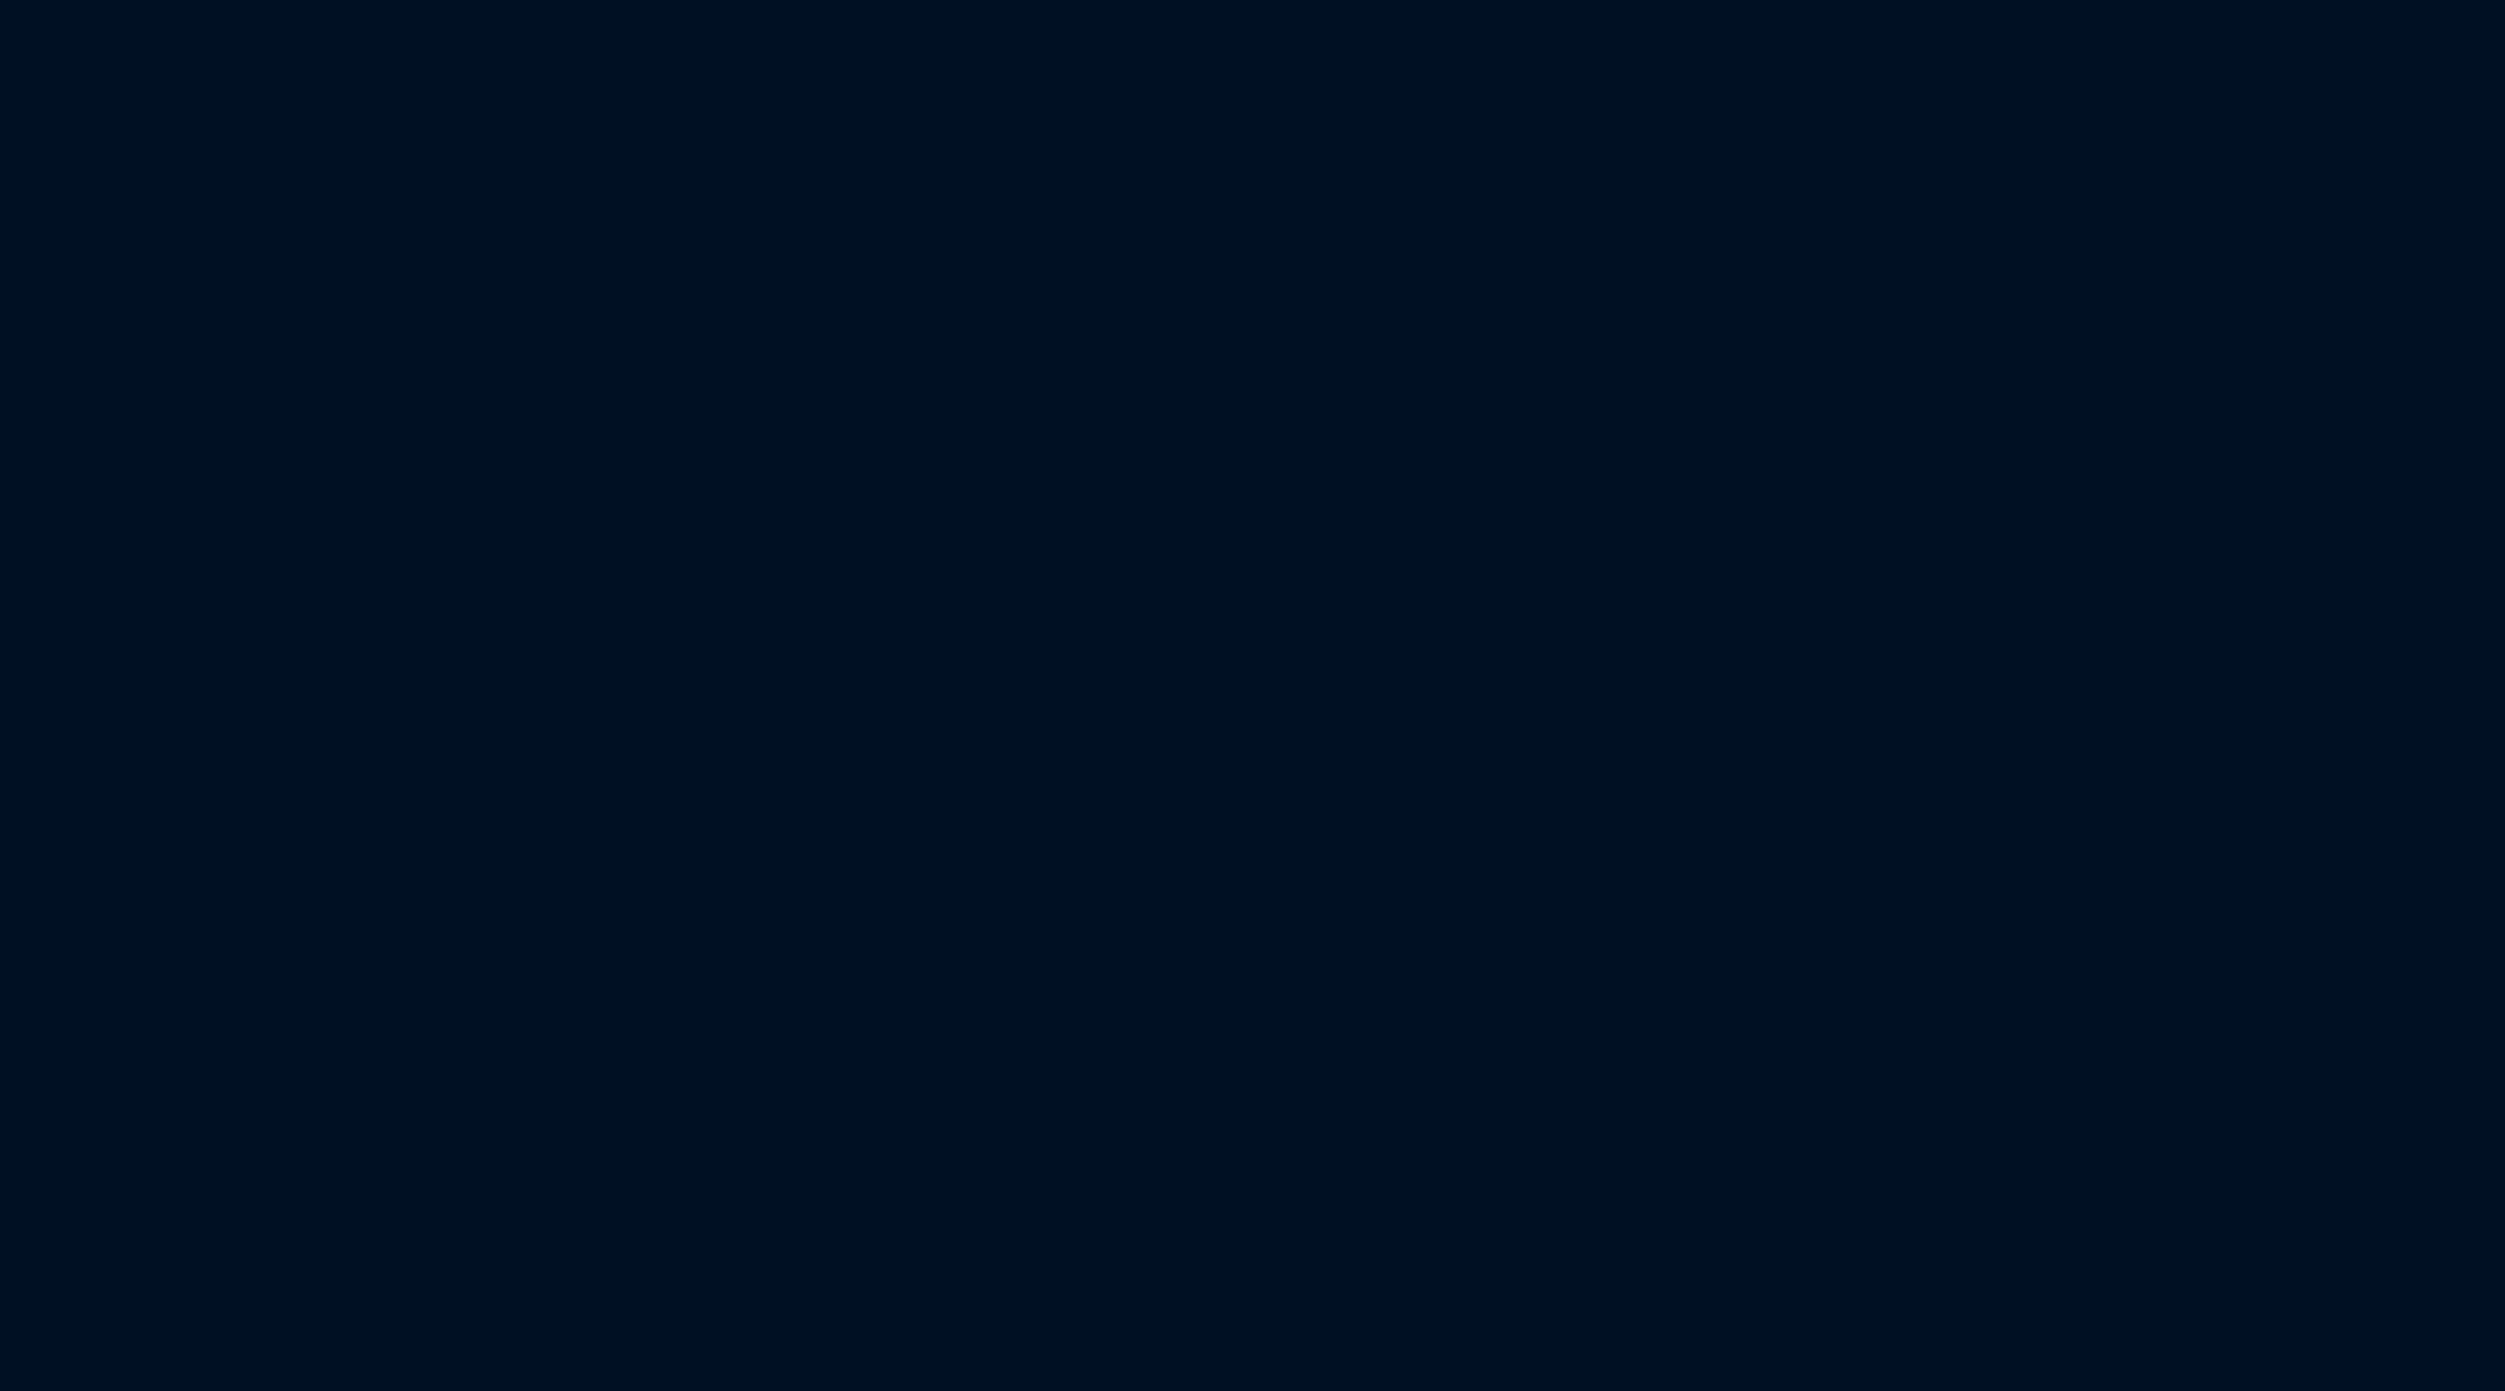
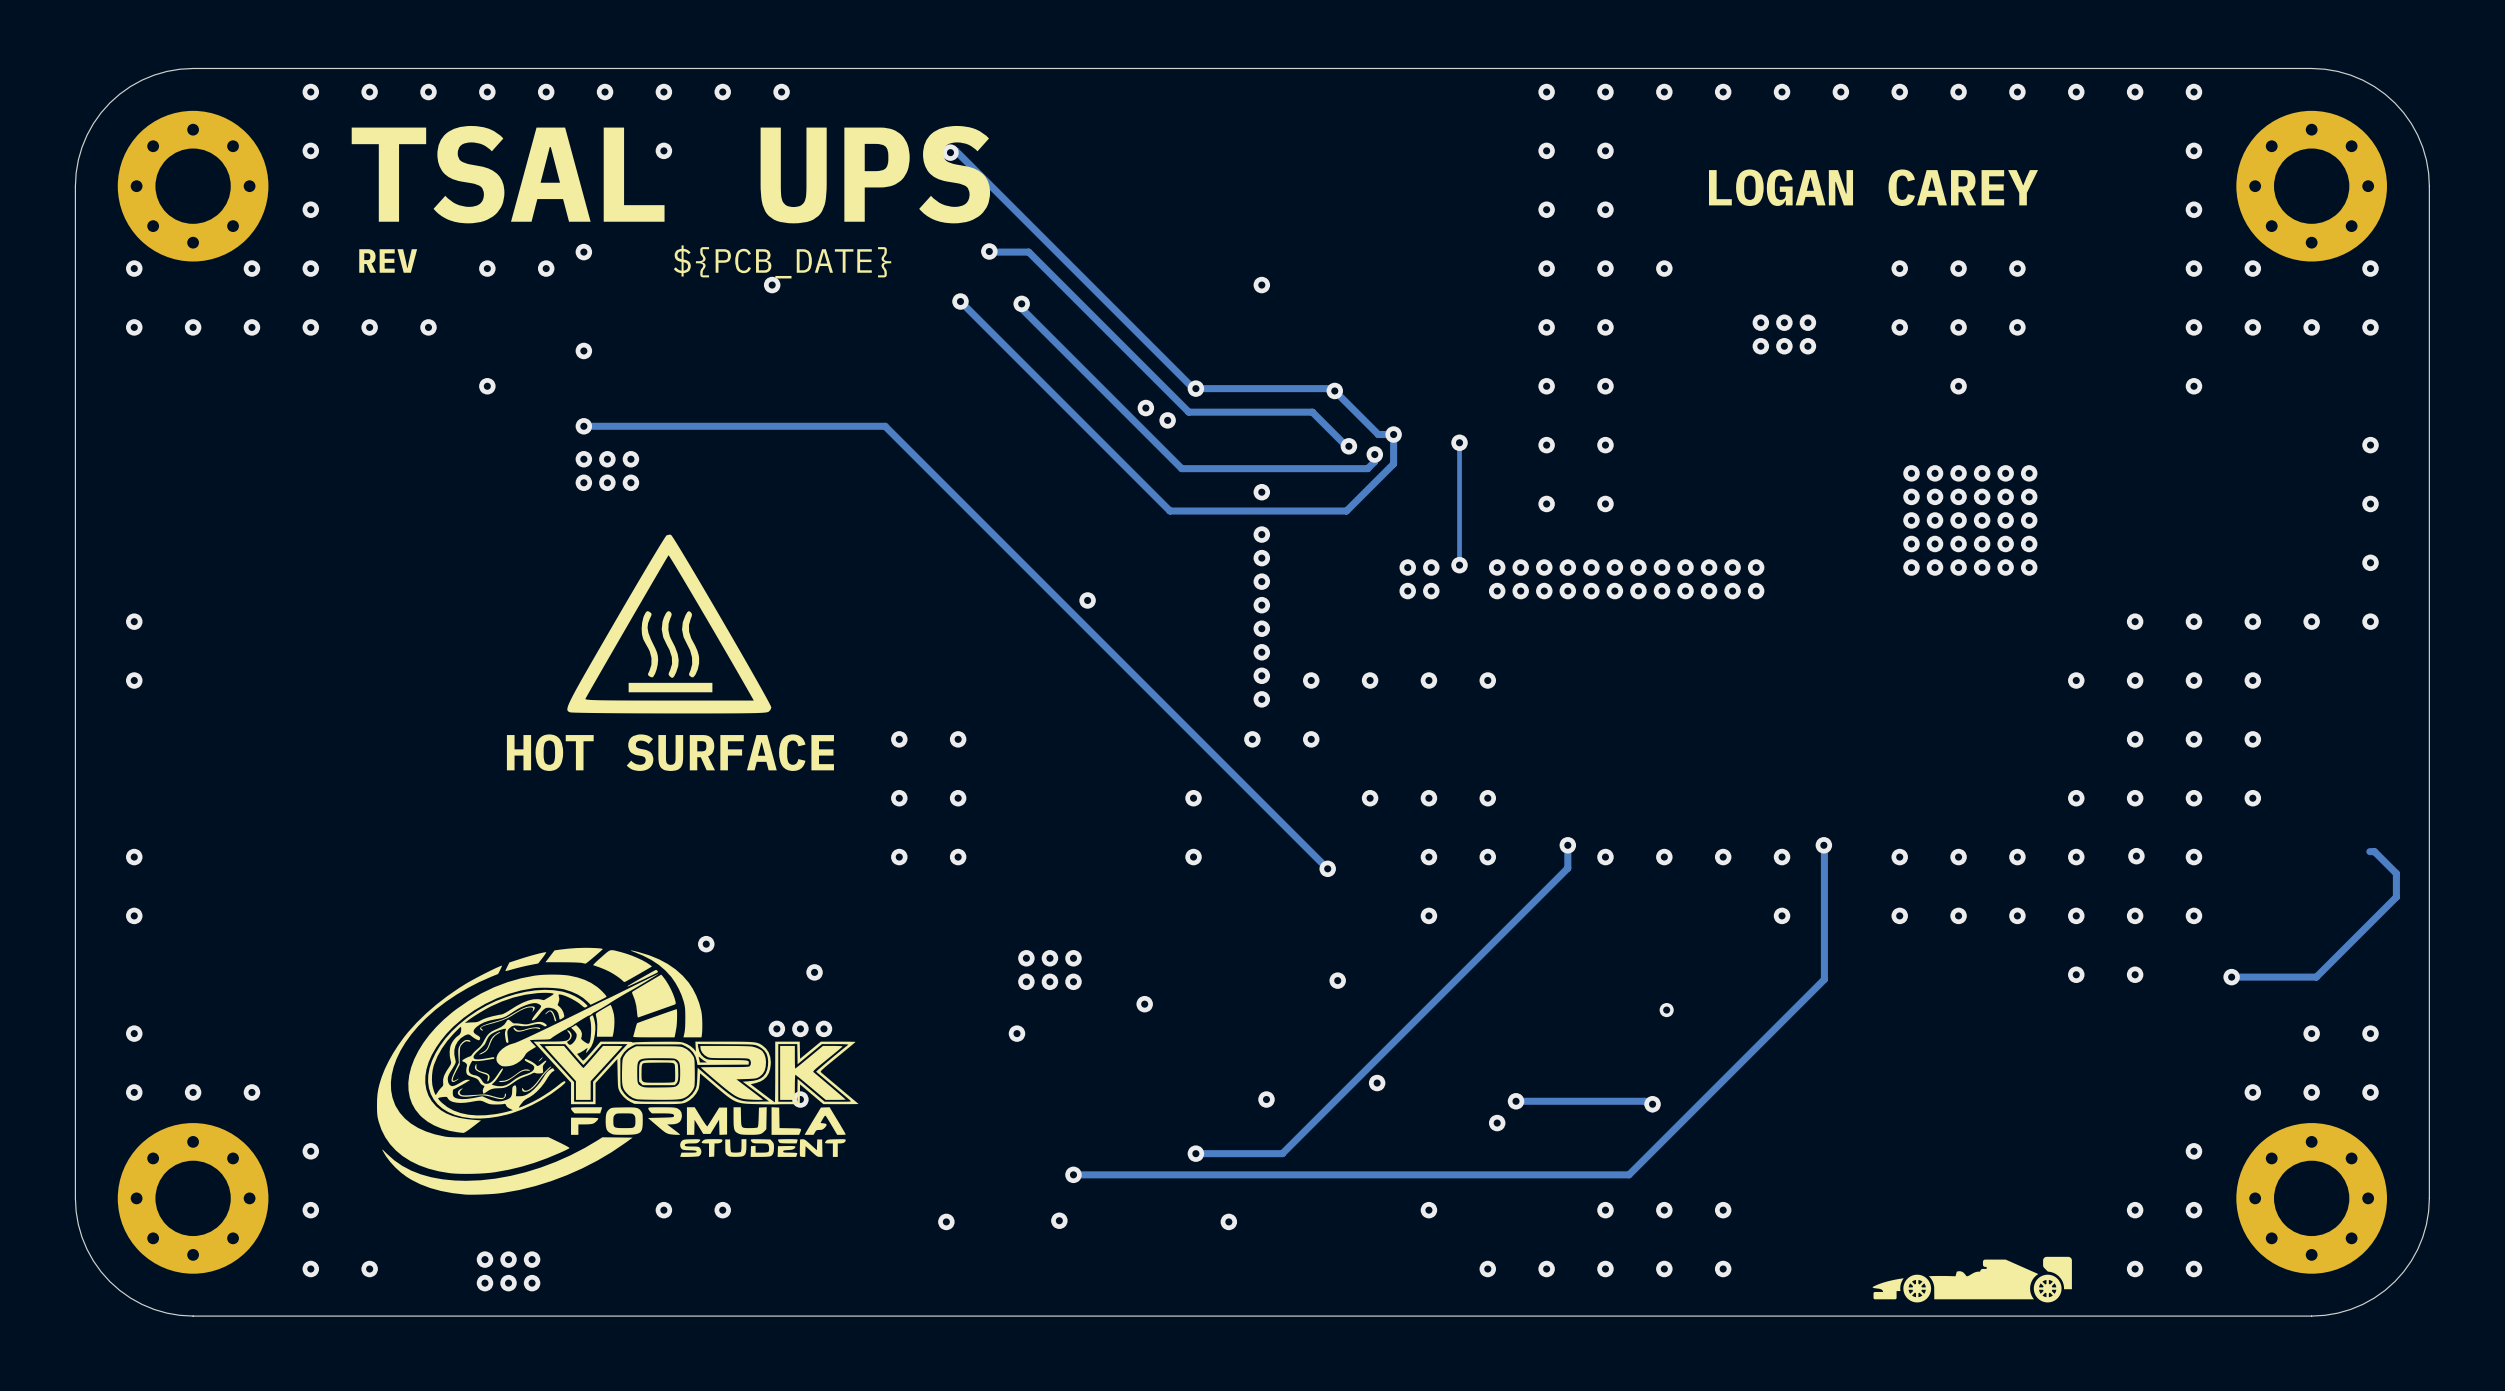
board edge: none -> (2311, 68) (193, 68) (166, 71) (142, 80) (119, 94) (93, 123) (82, 147) (75, 186) (75, 1198) (78, 1224) (87, 1249) (109, 1281) (130, 1298) (166, 1313) (193, 1316) (2311, 1316) (2337, 1313) (2362, 1304) (2385, 1290) (2411, 1261) (2422, 1237) (2428, 1211) (2429, 186) (2422, 147) (2411, 123) (2394, 102) (2374, 86) (2350, 75) (2311, 68)
via: none -> (310, 92)
via: none -> (369, 92)
via: none -> (428, 92)
via: none -> (487, 92)
via: none -> (546, 92)
via: none -> (605, 92)
via: none -> (663, 92)
via: none -> (722, 92)
via: none -> (781, 92)
via: none -> (1546, 92)
via: none -> (1605, 92)
via: none -> (1664, 92)
via: none -> (1723, 92)
via: none -> (1782, 92)
via: none -> (1840, 92)
via: none -> (1899, 92)
via: none -> (1958, 92)
via: none -> (2017, 92)
via: none -> (2076, 92)
via: none -> (2135, 92)
via: none -> (2193, 92)
via: none -> (310, 150)
via: none -> (663, 150)
via: none -> (1546, 150)
via: none -> (1605, 150)
via: none -> (2193, 150)
track: none -> (950, 152) (955, 150) (1193, 388) (1332, 388) (1378, 434) (1393, 434) (1393, 463) (1346, 511) (1169, 511) (960, 301)
via: none -> (950, 152)
text: none -> TSAL UPS (670, 174)
part: none -> (193, 186)
part: none -> (2311, 186)
text: none -> LOGAN CAREY (1873, 187)
via: none -> (310, 209)
via: none -> (1546, 209)
via: none -> (1605, 209)
via: none -> (2193, 209)
track: none -> (989, 251) (1028, 252) (1188, 412) (1312, 412) (1348, 448) (1348, 446)
via: none -> (989, 251)
via: none -> (583, 252)
text: none -> REV (388, 260)
text: none -> ${PCB_DATE} (782, 261)
via: none -> (134, 268)
via: none -> (251, 268)
via: none -> (310, 268)
via: none -> (487, 268)
via: none -> (546, 268)
via: none -> (1546, 268)
via: none -> (1605, 268)
via: none -> (1664, 268)
via: none -> (1899, 268)
via: none -> (1958, 268)
via: none -> (2017, 268)
via: none -> (2193, 268)
via: none -> (2252, 268)
via: none -> (2370, 268)
via: none -> (772, 285)
via: none -> (1261, 285)
via: none -> (960, 301)
track: none -> (1021, 303) (1021, 308) (1181, 468) (1367, 468) (1374, 461) (1374, 454)
via: none -> (1021, 303)
via: none -> (1760, 322)
via: none -> (1784, 322)
via: none -> (1807, 322)
via: none -> (134, 327)
via: none -> (193, 327)
via: none -> (251, 327)
via: none -> (310, 327)
via: none -> (369, 327)
via: none -> (428, 327)
via: none -> (1546, 327)
via: none -> (1605, 327)
via: none -> (1899, 327)
via: none -> (1958, 327)
via: none -> (2017, 327)
via: none -> (2193, 327)
via: none -> (2252, 327)
via: none -> (2311, 327)
via: none -> (2370, 327)
via: none -> (1760, 346)
via: none -> (1784, 346)
via: none -> (1807, 346)
via: none -> (583, 350)
via: none -> (487, 386)
via: none -> (1546, 386)
via: none -> (1605, 386)
via: none -> (1958, 386)
via: none -> (2193, 386)
via: none -> (1195, 388)
via: none -> (1334, 390)
via: none -> (1145, 408)
via: none -> (1167, 420)
track: none -> (583, 426) (885, 426) (1327, 868)
via: none -> (583, 426)
via: none -> (1393, 434)
track: none -> (1459, 442) (1459, 565)
via: none -> (1459, 442)
via: none -> (1546, 445)
via: none -> (1605, 445)
via: none -> (2370, 445)
via: none -> (1348, 446)
via: none -> (1374, 454)
via: none -> (583, 459)
via: none -> (607, 459)
via: none -> (630, 459)
via: none -> (1911, 473)
via: none -> (1935, 473)
via: none -> (1958, 473)
via: none -> (1982, 473)
via: none -> (2005, 473)
via: none -> (2029, 473)
via: none -> (583, 482)
via: none -> (607, 482)
via: none -> (630, 482)
via: none -> (1261, 492)
via: none -> (1911, 496)
via: none -> (1935, 496)
via: none -> (1958, 496)
via: none -> (1982, 496)
via: none -> (2005, 496)
via: none -> (2029, 496)
via: none -> (1546, 503)
via: none -> (1605, 503)
via: none -> (2370, 503)
via: none -> (1911, 520)
via: none -> (1935, 520)
via: none -> (1958, 520)
via: none -> (1982, 520)
via: none -> (2005, 520)
via: none -> (2029, 520)
drawing: none -> [567, 534, 772, 714]
via: none -> (1261, 534)
via: none -> (1911, 543)
via: none -> (1935, 543)
via: none -> (1958, 543)
via: none -> (1982, 543)
via: none -> (2005, 543)
via: none -> (2029, 543)
via: none -> (1261, 558)
via: none -> (2370, 562)
via: none -> (1459, 565)
via: none -> (1407, 567)
via: none -> (1431, 567)
via: none -> (1497, 567)
via: none -> (1520, 567)
via: none -> (1544, 567)
via: none -> (1567, 567)
via: none -> (1591, 567)
via: none -> (1614, 567)
via: none -> (1638, 567)
via: none -> (1661, 567)
via: none -> (1685, 567)
via: none -> (1709, 567)
via: none -> (1732, 567)
via: none -> (1756, 567)
via: none -> (1911, 567)
via: none -> (1935, 567)
via: none -> (1958, 567)
via: none -> (1982, 567)
via: none -> (2005, 567)
via: none -> (2029, 567)
via: none -> (1261, 581)
via: none -> (1407, 591)
via: none -> (1431, 591)
via: none -> (1497, 591)
via: none -> (1520, 591)
via: none -> (1544, 591)
via: none -> (1567, 591)
via: none -> (1591, 591)
via: none -> (1614, 591)
via: none -> (1638, 591)
via: none -> (1661, 591)
via: none -> (1685, 591)
via: none -> (1709, 591)
via: none -> (1732, 591)
via: none -> (1756, 591)
via: none -> (1087, 600)
via: none -> (1261, 605)
via: none -> (134, 621)
via: none -> (2135, 621)
via: none -> (2193, 621)
via: none -> (2252, 621)
via: none -> (2311, 621)
via: none -> (2370, 621)
via: none -> (1261, 628)
via: none -> (1261, 652)
via: none -> (1261, 675)
via: none -> (134, 680)
via: none -> (1311, 680)
via: none -> (1370, 680)
via: none -> (1428, 680)
via: none -> (1487, 680)
via: none -> (2076, 680)
via: none -> (2135, 680)
via: none -> (2193, 680)
via: none -> (2252, 680)
via: none -> (1261, 699)
via: none -> (899, 739)
via: none -> (958, 739)
via: none -> (1252, 739)
via: none -> (1311, 739)
via: none -> (2135, 739)
via: none -> (2193, 739)
via: none -> (2252, 739)
text: none -> HOT SURFACE (670, 752)
via: none -> (899, 798)
via: none -> (958, 798)
via: none -> (1193, 798)
via: none -> (1370, 798)
via: none -> (1428, 798)
via: none -> (1487, 798)
via: none -> (2076, 798)
via: none -> (2135, 798)
via: none -> (2193, 798)
via: none -> (2252, 798)
track: none -> (1567, 845) (1567, 868) (1282, 1153) (1195, 1153)
via: none -> (1567, 845)
track: none -> (1823, 845) (1824, 979) (1629, 1174) (1073, 1174)
via: none -> (1823, 845)
track: none -> (2369, 851) (2374, 851) (2396, 873) (2396, 897) (2316, 977) (2231, 977)
via: none -> (2136, 856)
via: none -> (134, 857)
via: none -> (899, 857)
via: none -> (958, 857)
via: none -> (1193, 857)
via: none -> (1428, 857)
via: none -> (1487, 857)
via: none -> (1605, 857)
via: none -> (1664, 857)
via: none -> (1723, 857)
via: none -> (1782, 857)
via: none -> (1899, 857)
via: none -> (1958, 857)
via: none -> (2017, 857)
via: none -> (2076, 857)
via: none -> (2193, 857)
via: none -> (1327, 868)
via: none -> (134, 915)
via: none -> (1428, 915)
via: none -> (1782, 915)
via: none -> (1899, 915)
via: none -> (1958, 915)
via: none -> (2017, 915)
via: none -> (2076, 915)
via: none -> (2135, 915)
via: none -> (2193, 915)
via: none -> (706, 944)
drawing: none -> [376, 947, 859, 1195]
via: none -> (1026, 958)
via: none -> (1049, 958)
via: none -> (1073, 958)
via: none -> (814, 972)
via: none -> (2076, 974)
via: none -> (2135, 974)
via: none -> (2231, 977)
via: none -> (1337, 980)
via: none -> (1026, 981)
via: none -> (1049, 981)
via: none -> (1073, 981)
via: none -> (1144, 1004)
via: none -> (1666, 1010)
via: none -> (776, 1028)
via: none -> (800, 1028)
via: none -> (823, 1028)
via: none -> (134, 1033)
via: none -> (1016, 1033)
via: none -> (2311, 1033)
via: none -> (2370, 1033)
via: none -> (1377, 1083)
via: none -> (134, 1092)
via: none -> (193, 1092)
via: none -> (251, 1092)
via: none -> (2252, 1092)
via: none -> (2311, 1092)
via: none -> (2370, 1092)
via: none -> (800, 1099)
via: none -> (1266, 1099)
track: none -> (1516, 1101) (1644, 1101) (1652, 1108) (1652, 1104)
via: none -> (1516, 1101)
via: none -> (1652, 1104)
via: none -> (1497, 1123)
via: none -> (310, 1151)
via: none -> (2193, 1151)
via: none -> (1195, 1153)
via: none -> (1073, 1174)
part: none -> (193, 1198)
part: none -> (2311, 1198)
via: none -> (310, 1210)
via: none -> (663, 1210)
via: none -> (722, 1210)
via: none -> (1428, 1210)
via: none -> (1605, 1210)
via: none -> (1664, 1210)
via: none -> (1723, 1210)
via: none -> (2135, 1210)
via: none -> (2193, 1210)
via: none -> (1059, 1220)
via: none -> (946, 1221)
via: none -> (1228, 1221)
drawing: none -> [1872, 1256, 2072, 1303]
via: none -> (484, 1259)
via: none -> (508, 1259)
via: none -> (532, 1259)
via: none -> (310, 1269)
via: none -> (369, 1269)
via: none -> (1487, 1269)
via: none -> (1546, 1269)
via: none -> (1605, 1269)
via: none -> (1664, 1269)
via: none -> (1723, 1269)
via: none -> (2135, 1269)
via: none -> (2193, 1269)
via: none -> (484, 1283)
via: none -> (508, 1283)
via: none -> (532, 1283)

